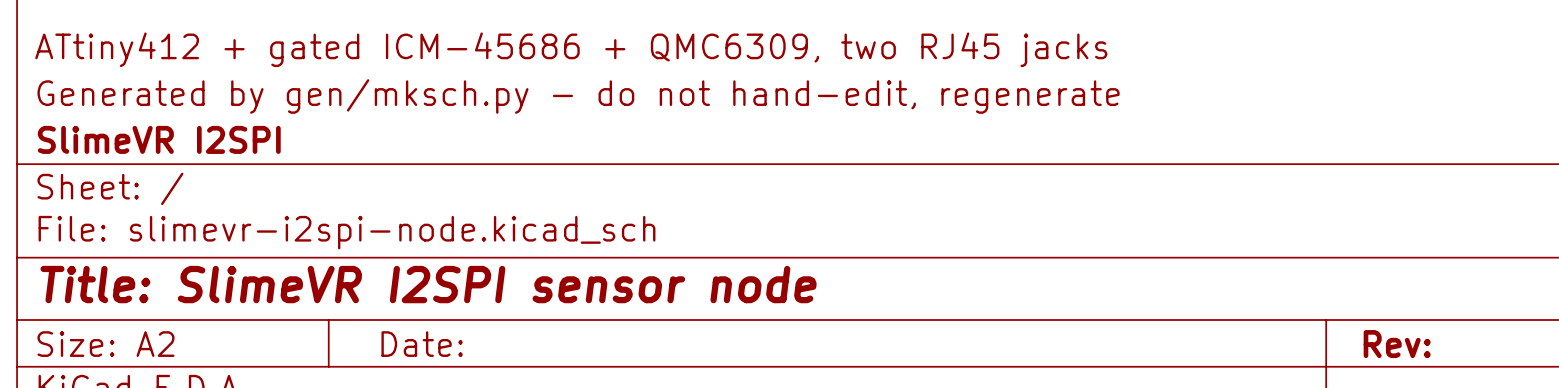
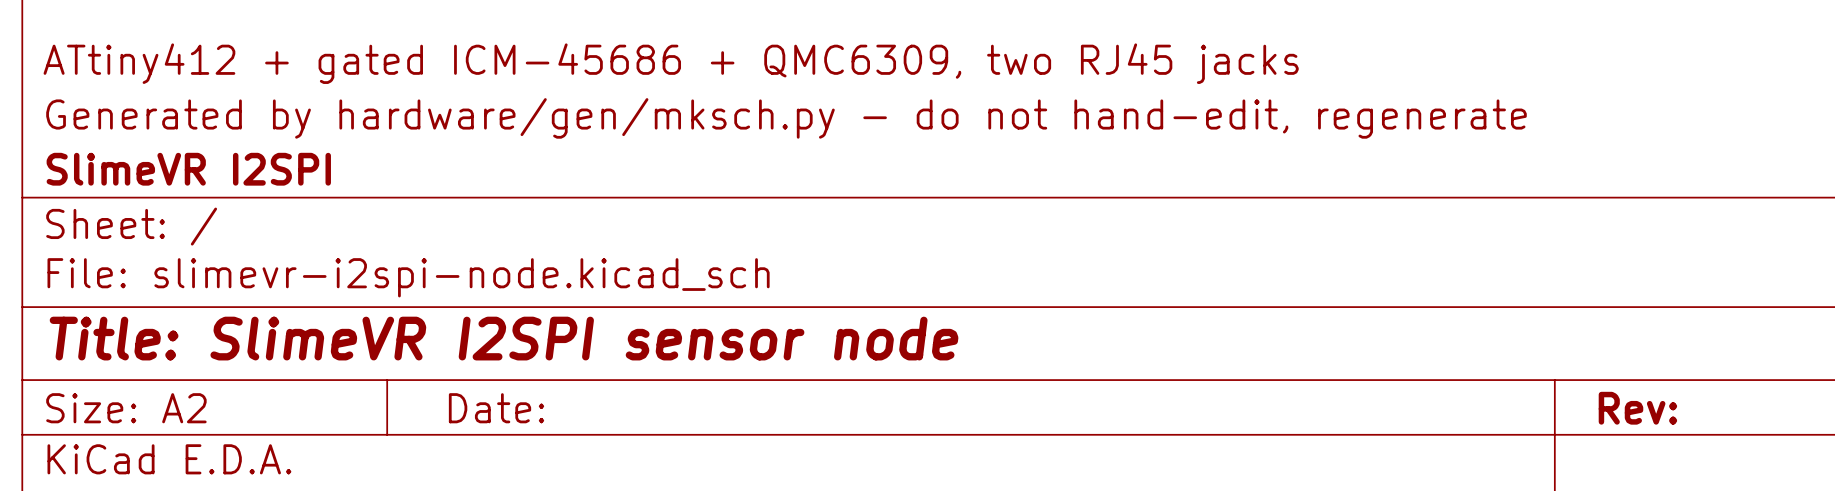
title block: Generated by gen/mksch.py - do not hand-edit, regenerate (578, 96) -> Generated by hardware/gen/mksch.py - do not hand-edit, regenerate (786, 118)

